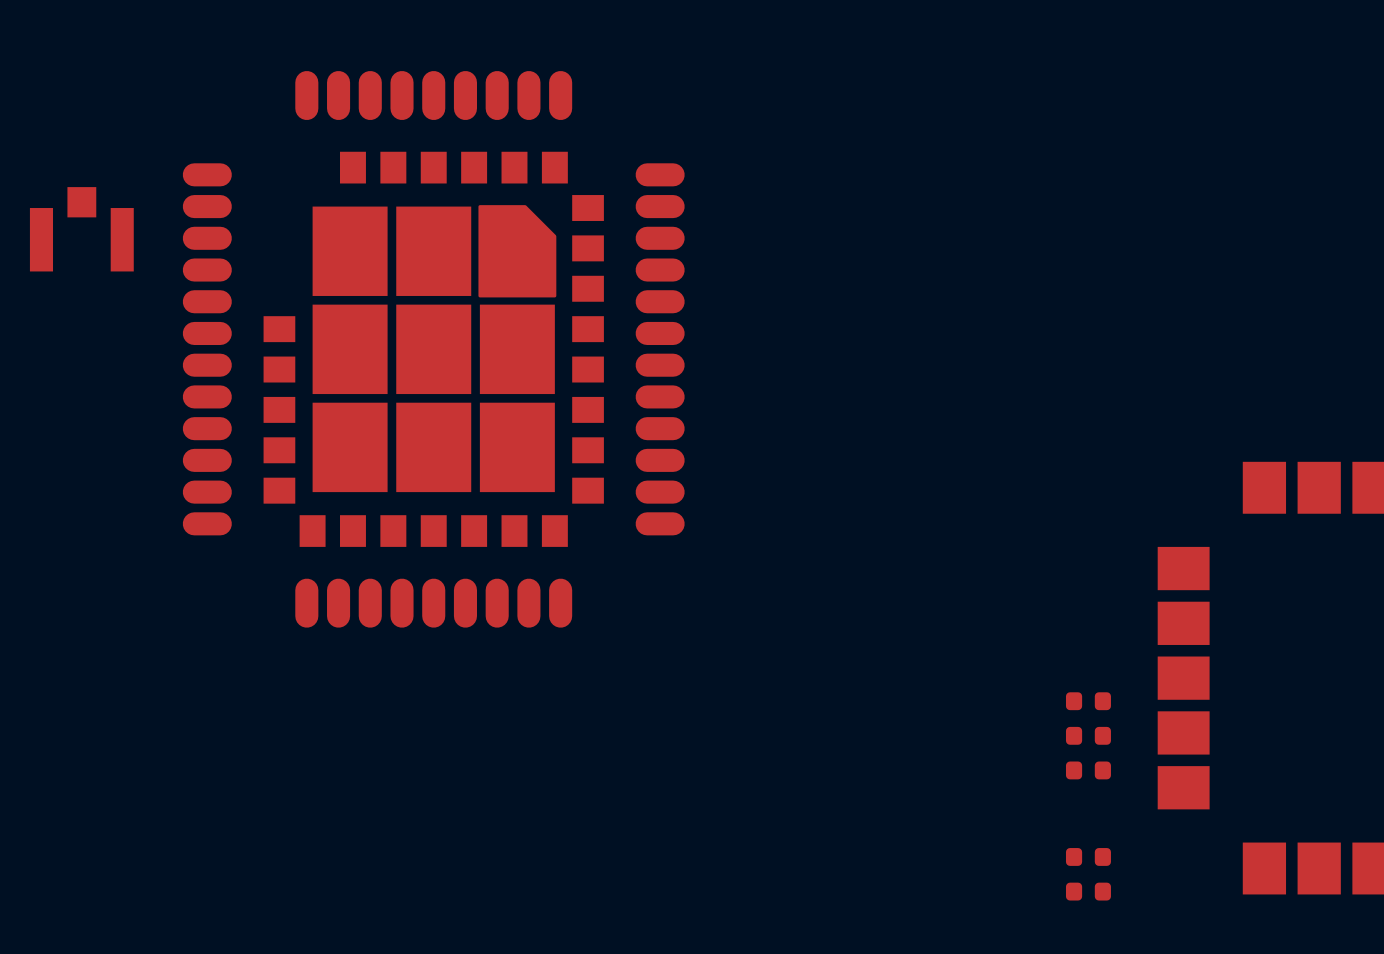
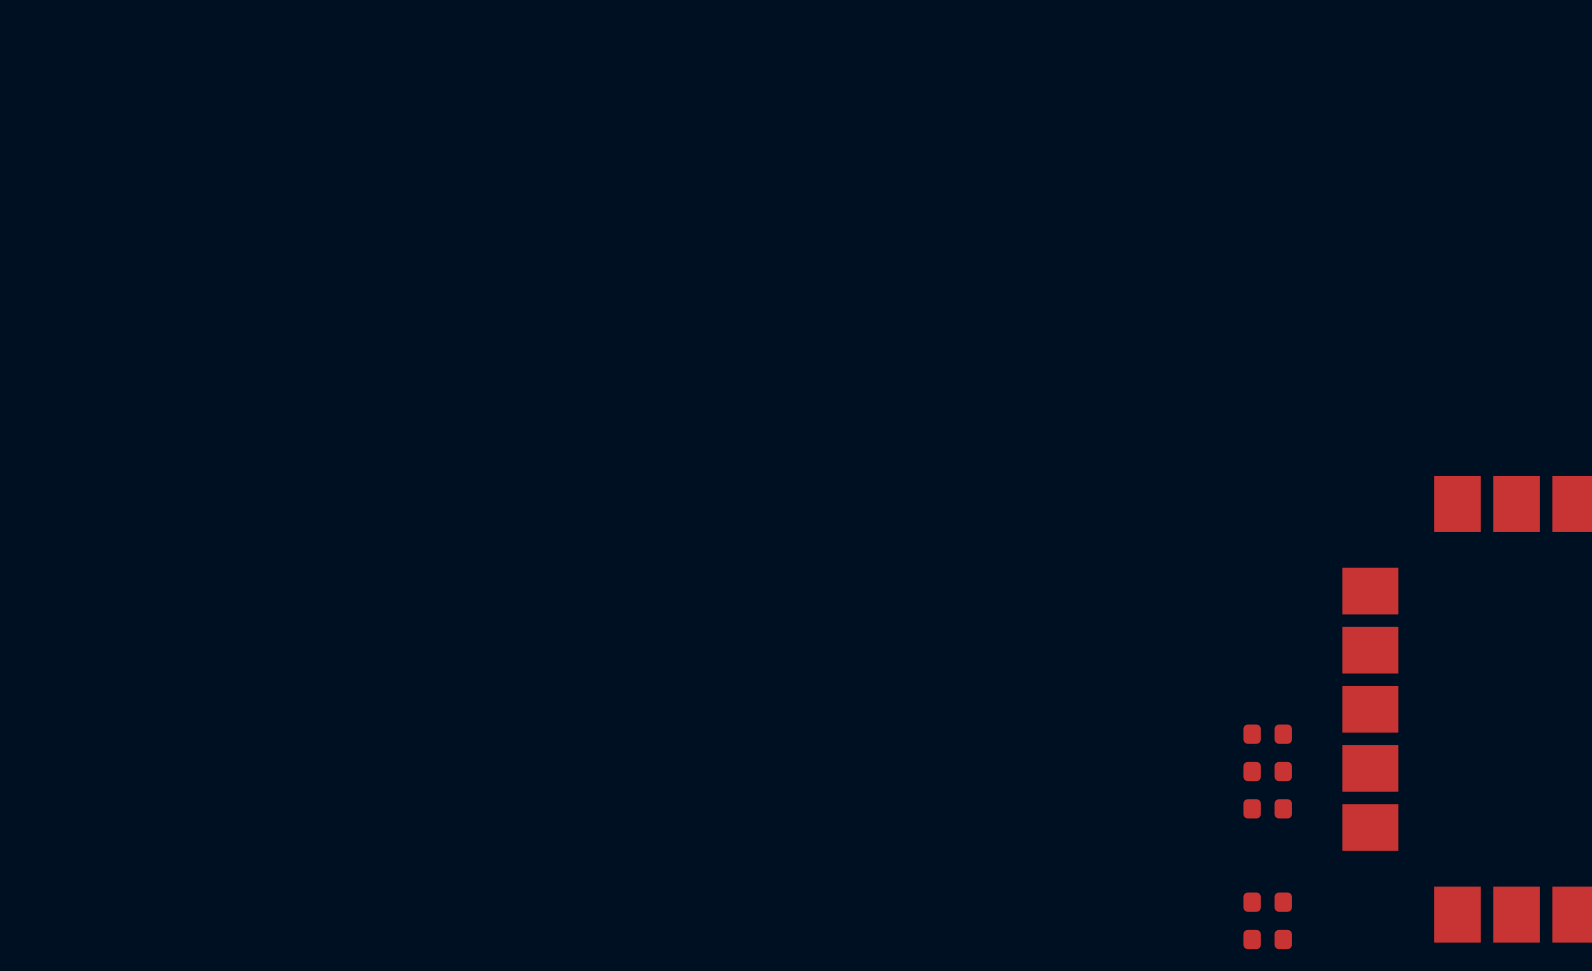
part: (81, 229) -> none
part: (433, 349) -> none

